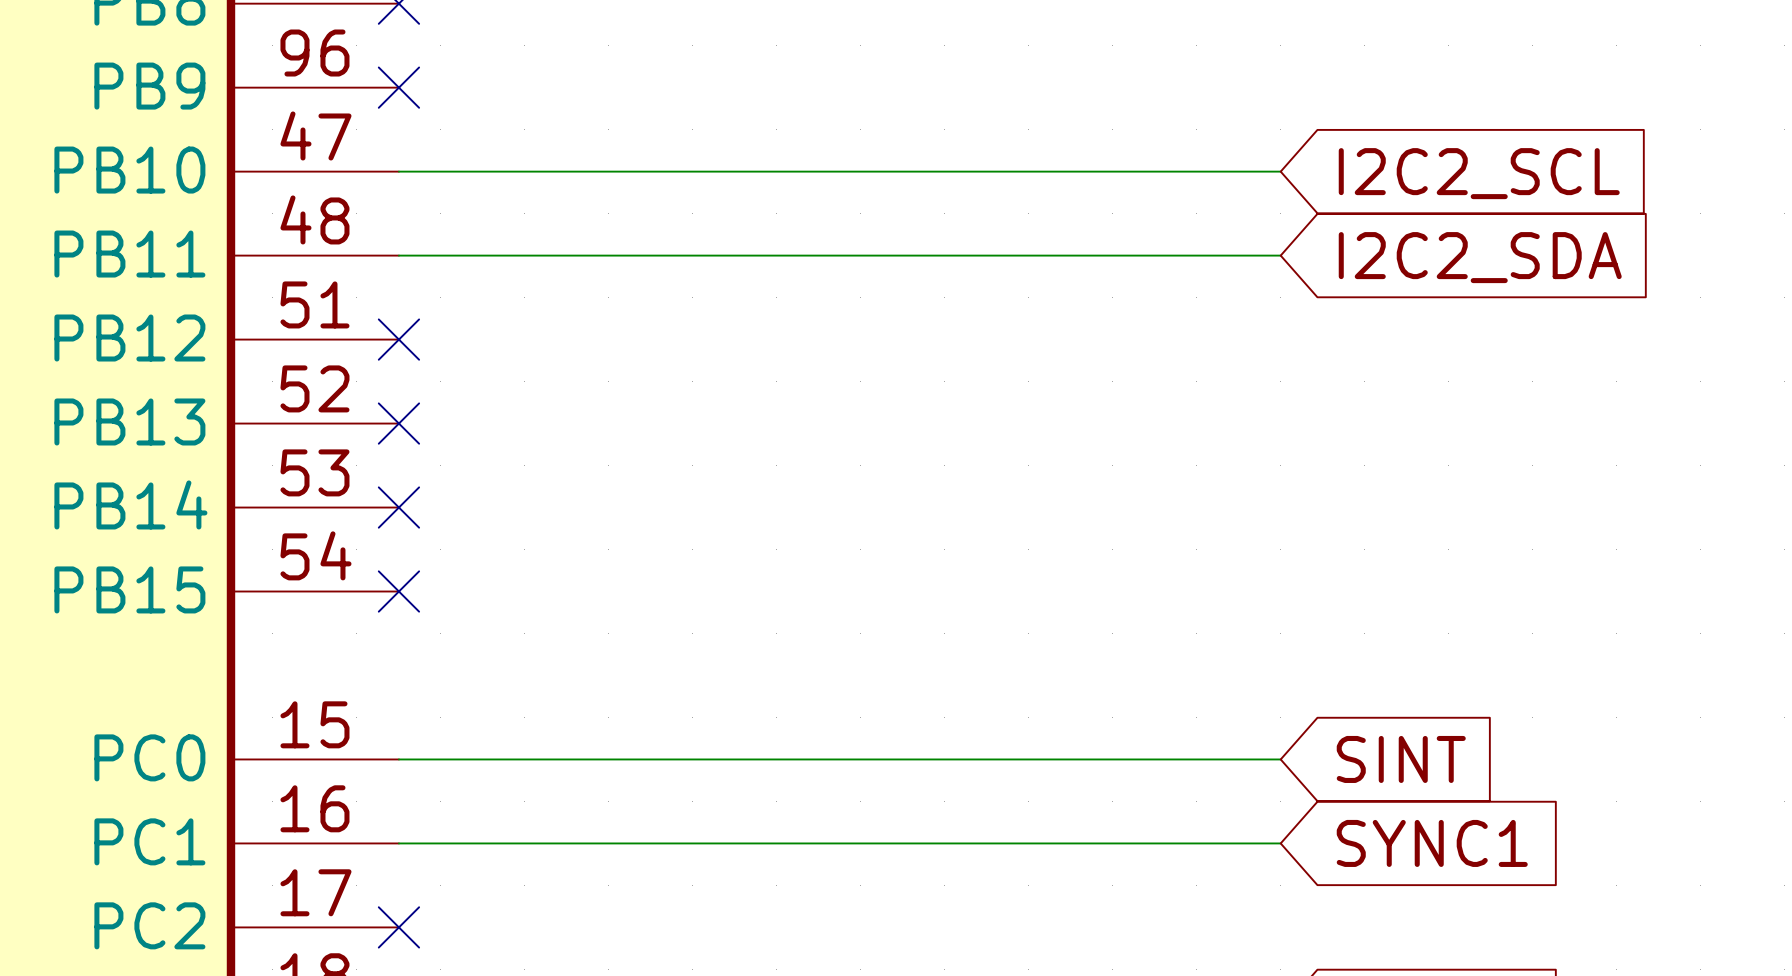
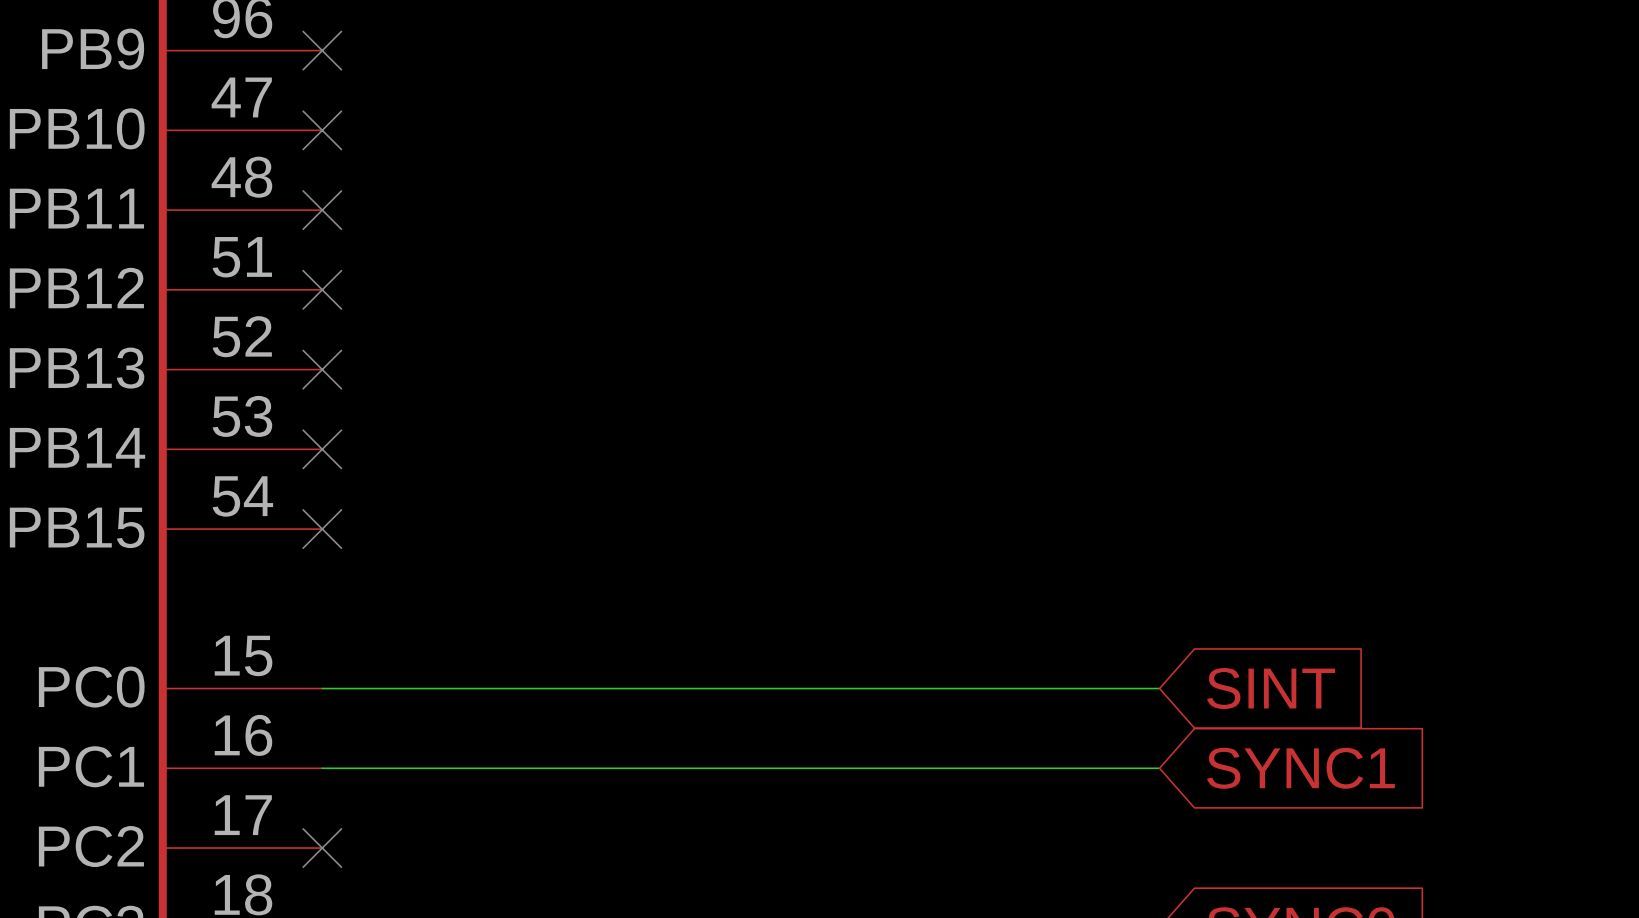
wire: (398, 171) (1280, 171) -> none
no-connect mark: none -> (322, 130)
global label: I2C2_SCL (1479, 173) -> none
wire: (398, 255) (1280, 255) -> none
no-connect mark: none -> (322, 210)
global label: I2C2_SDA (1480, 257) -> none

